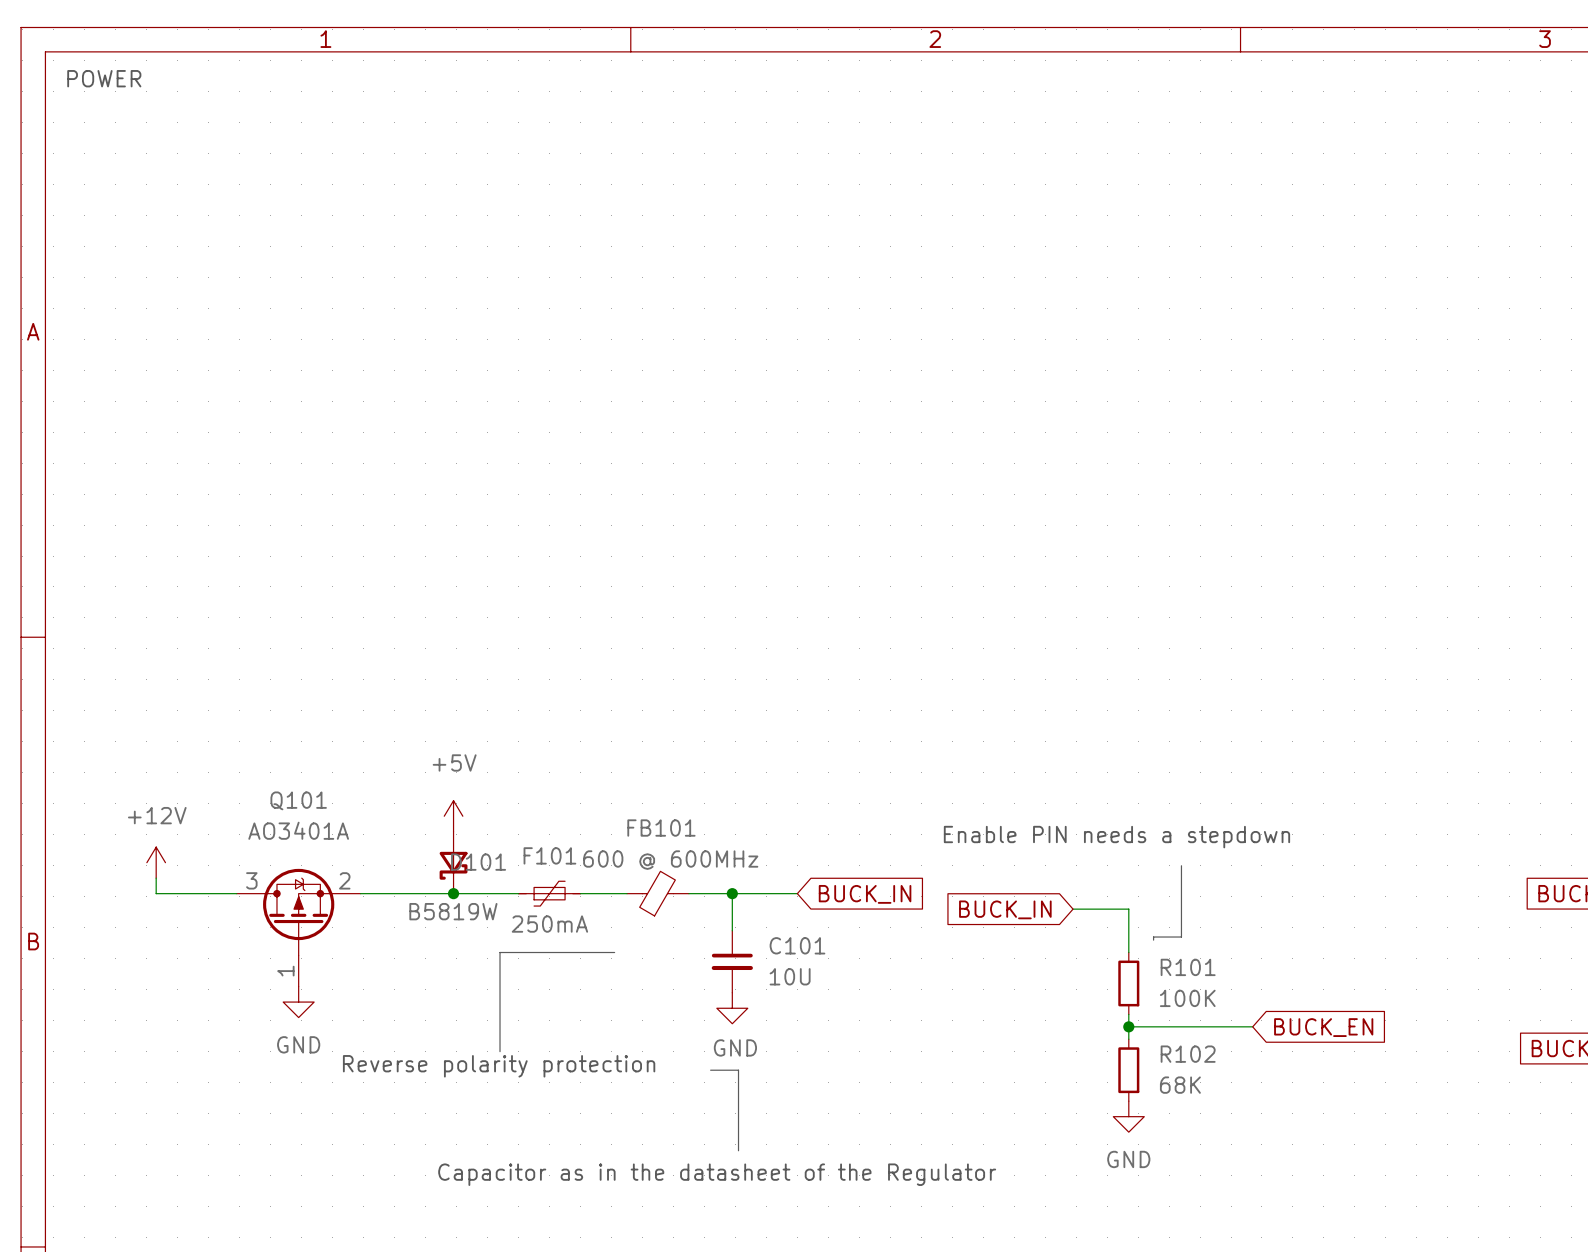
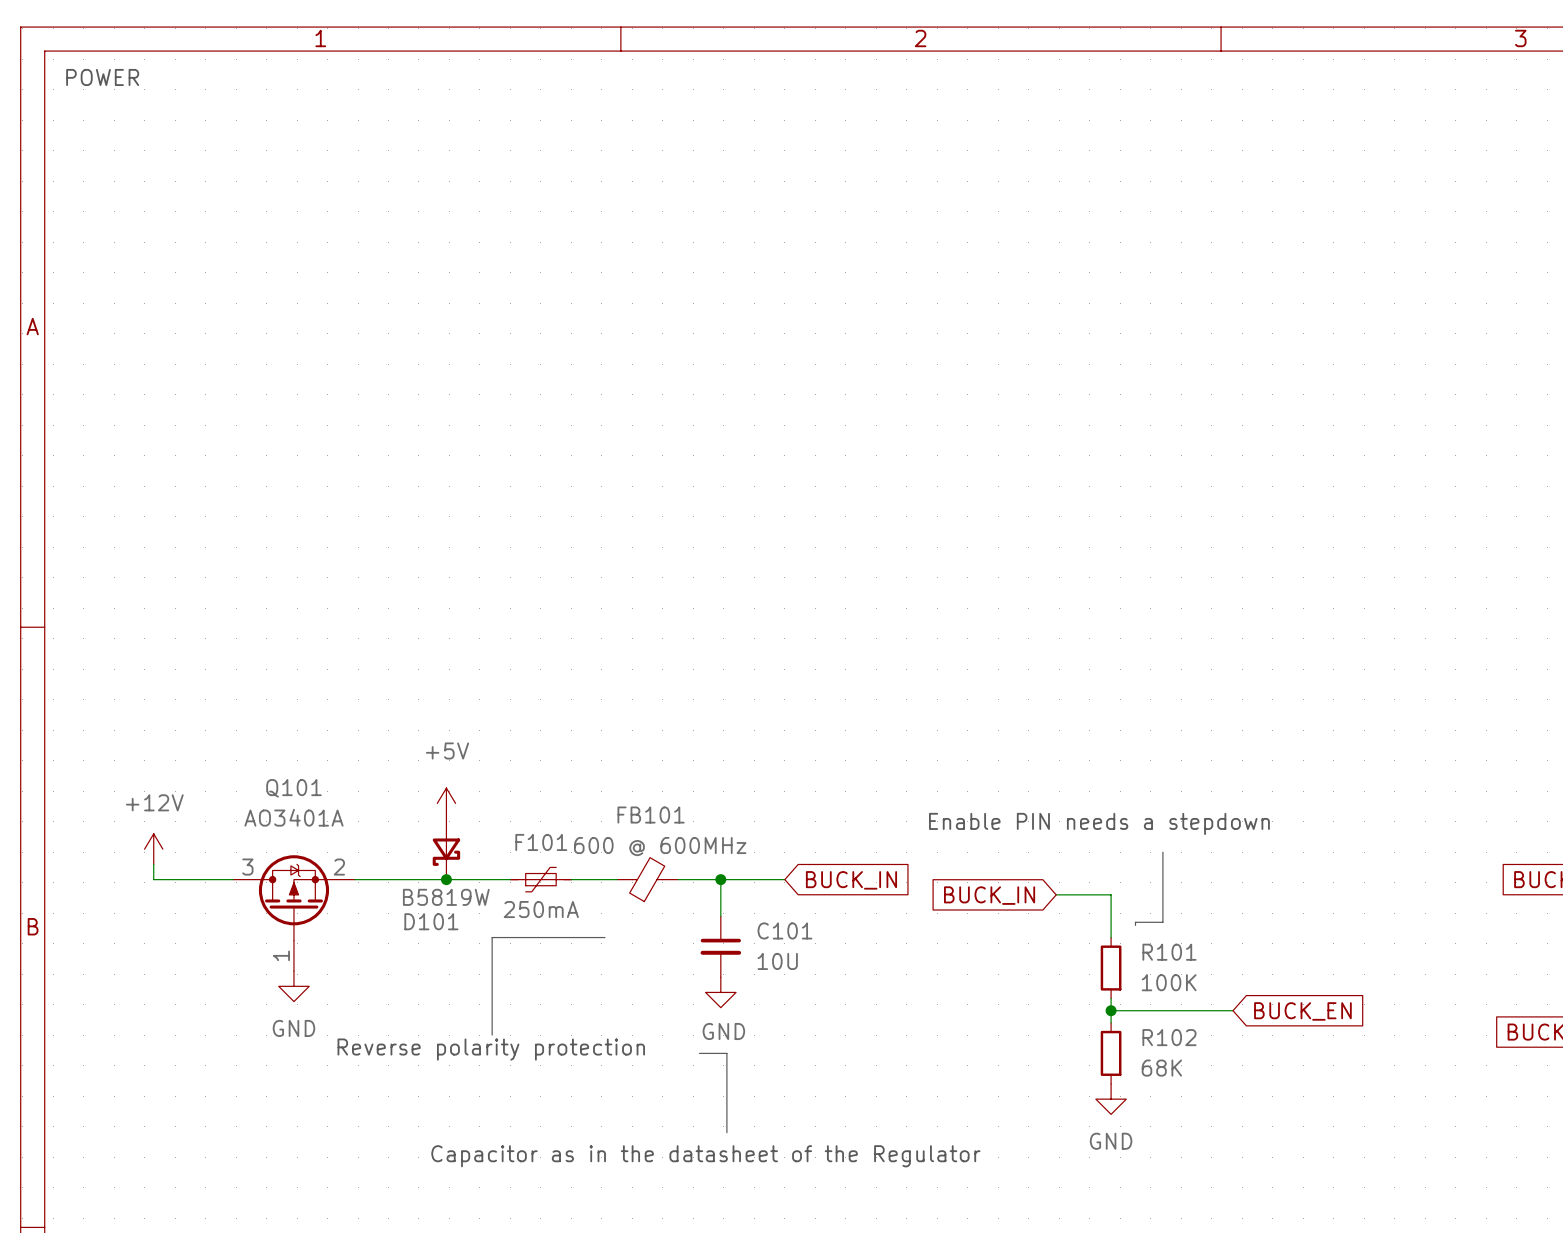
D101 name position: D101 (478, 862) -> D101 (431, 921)

